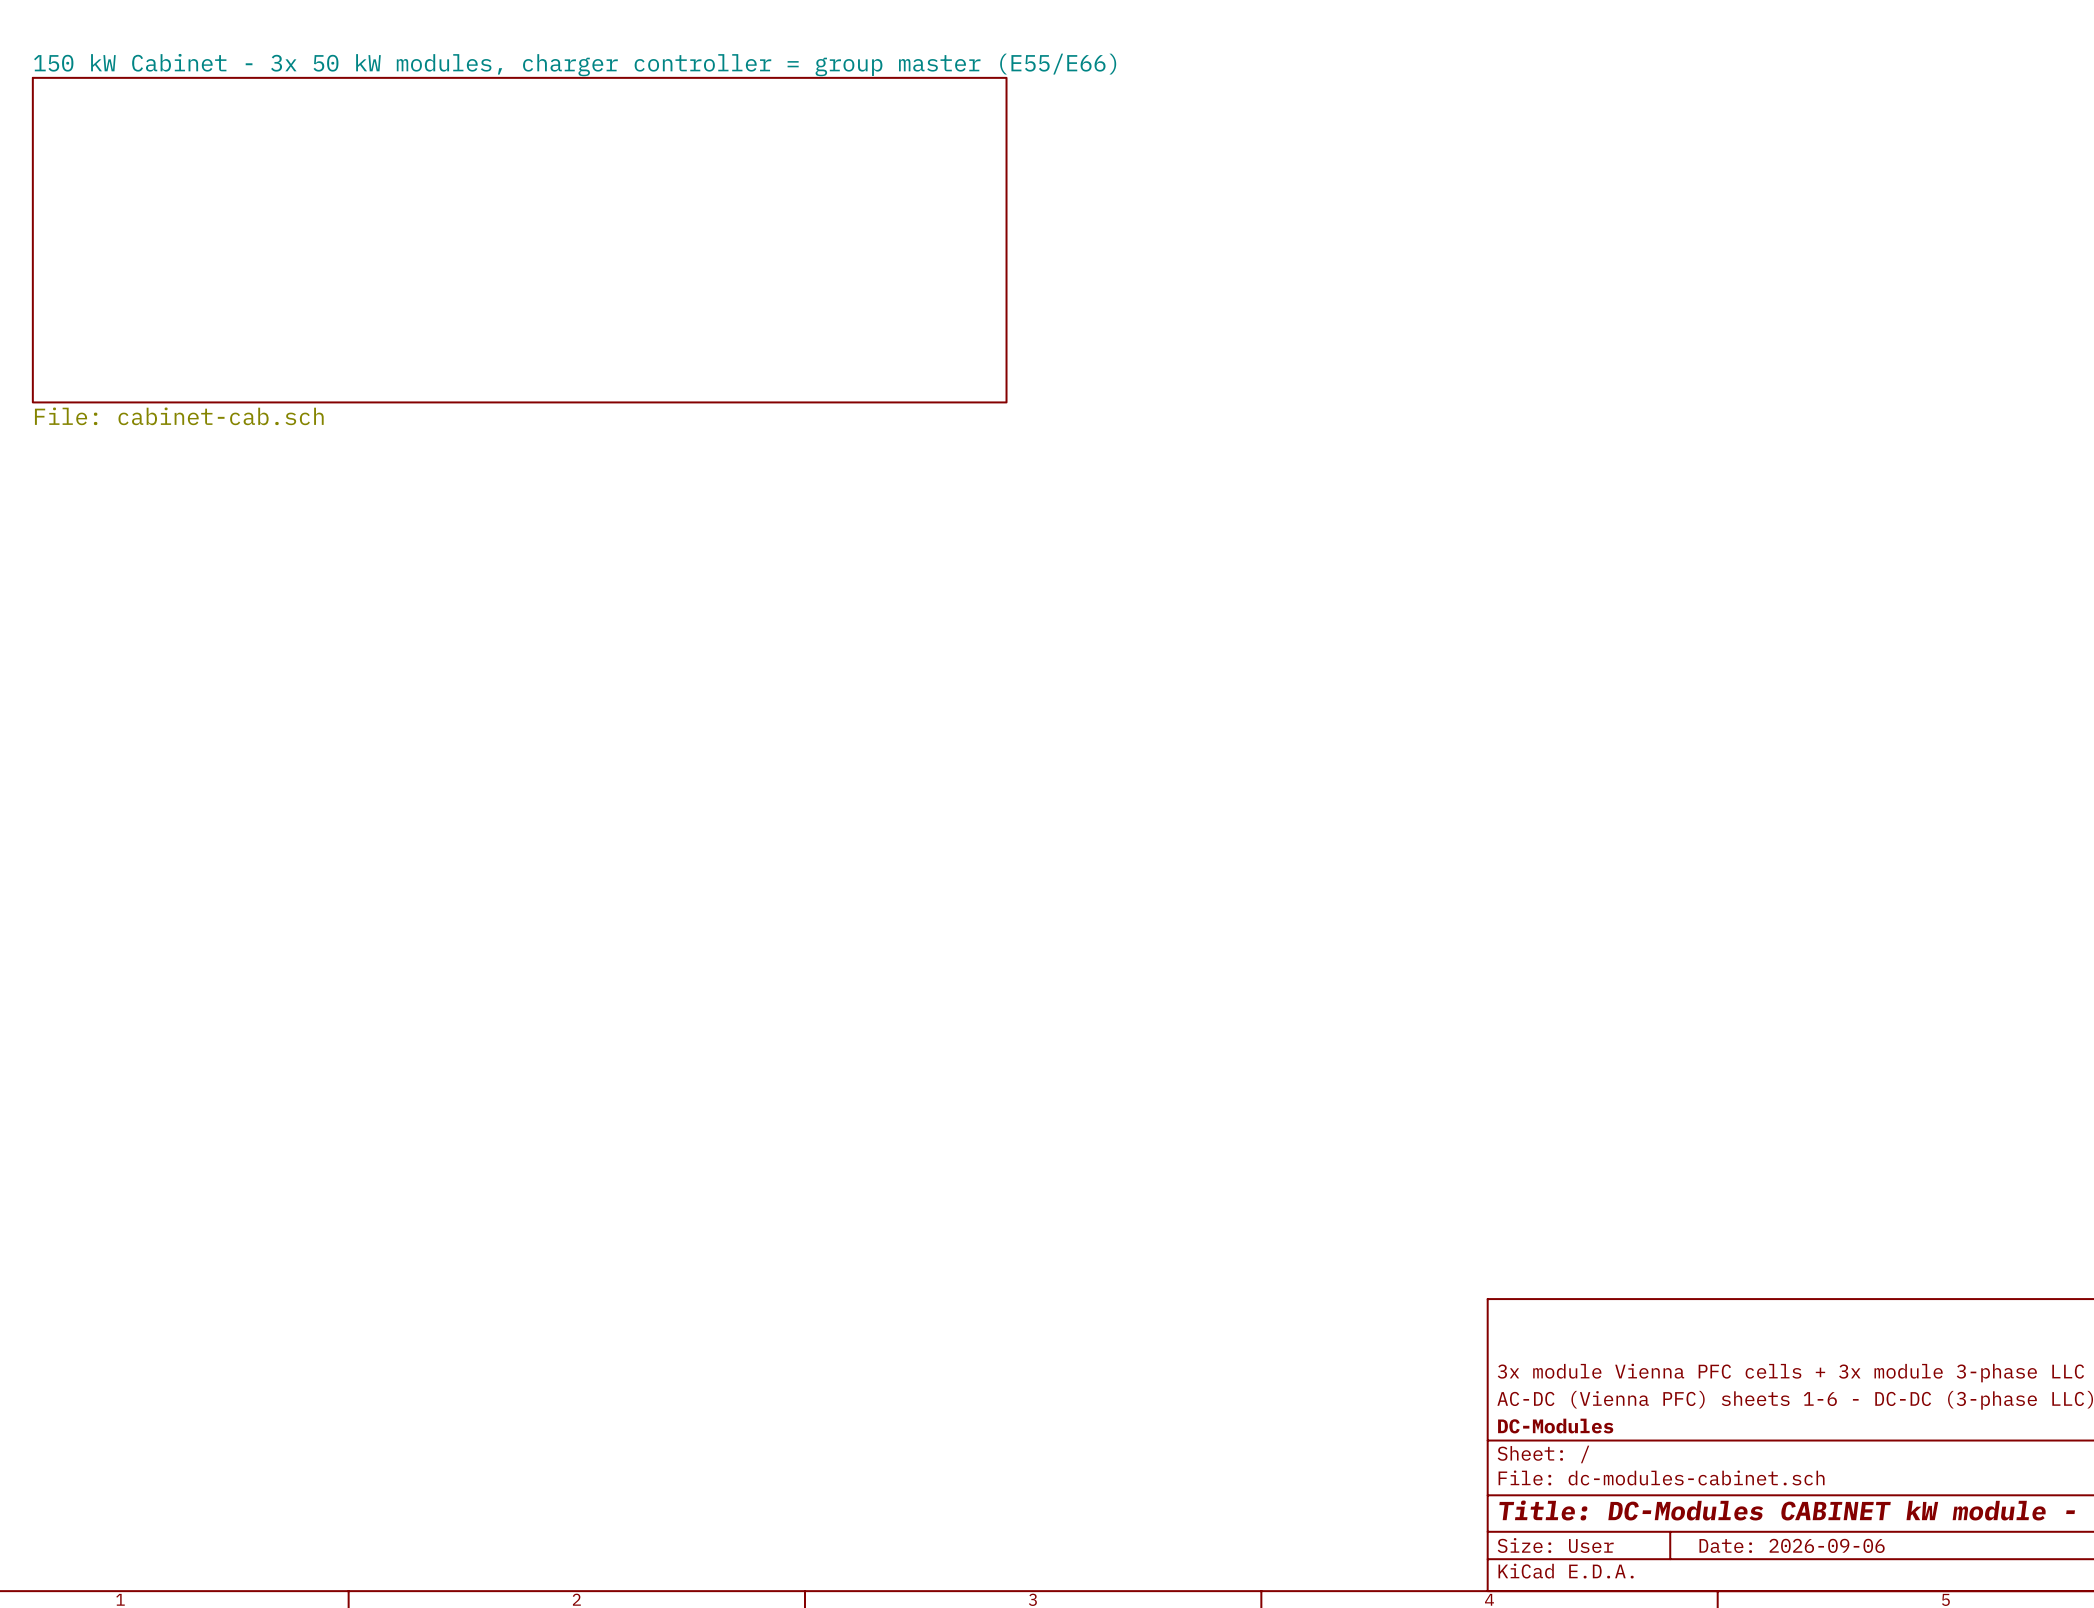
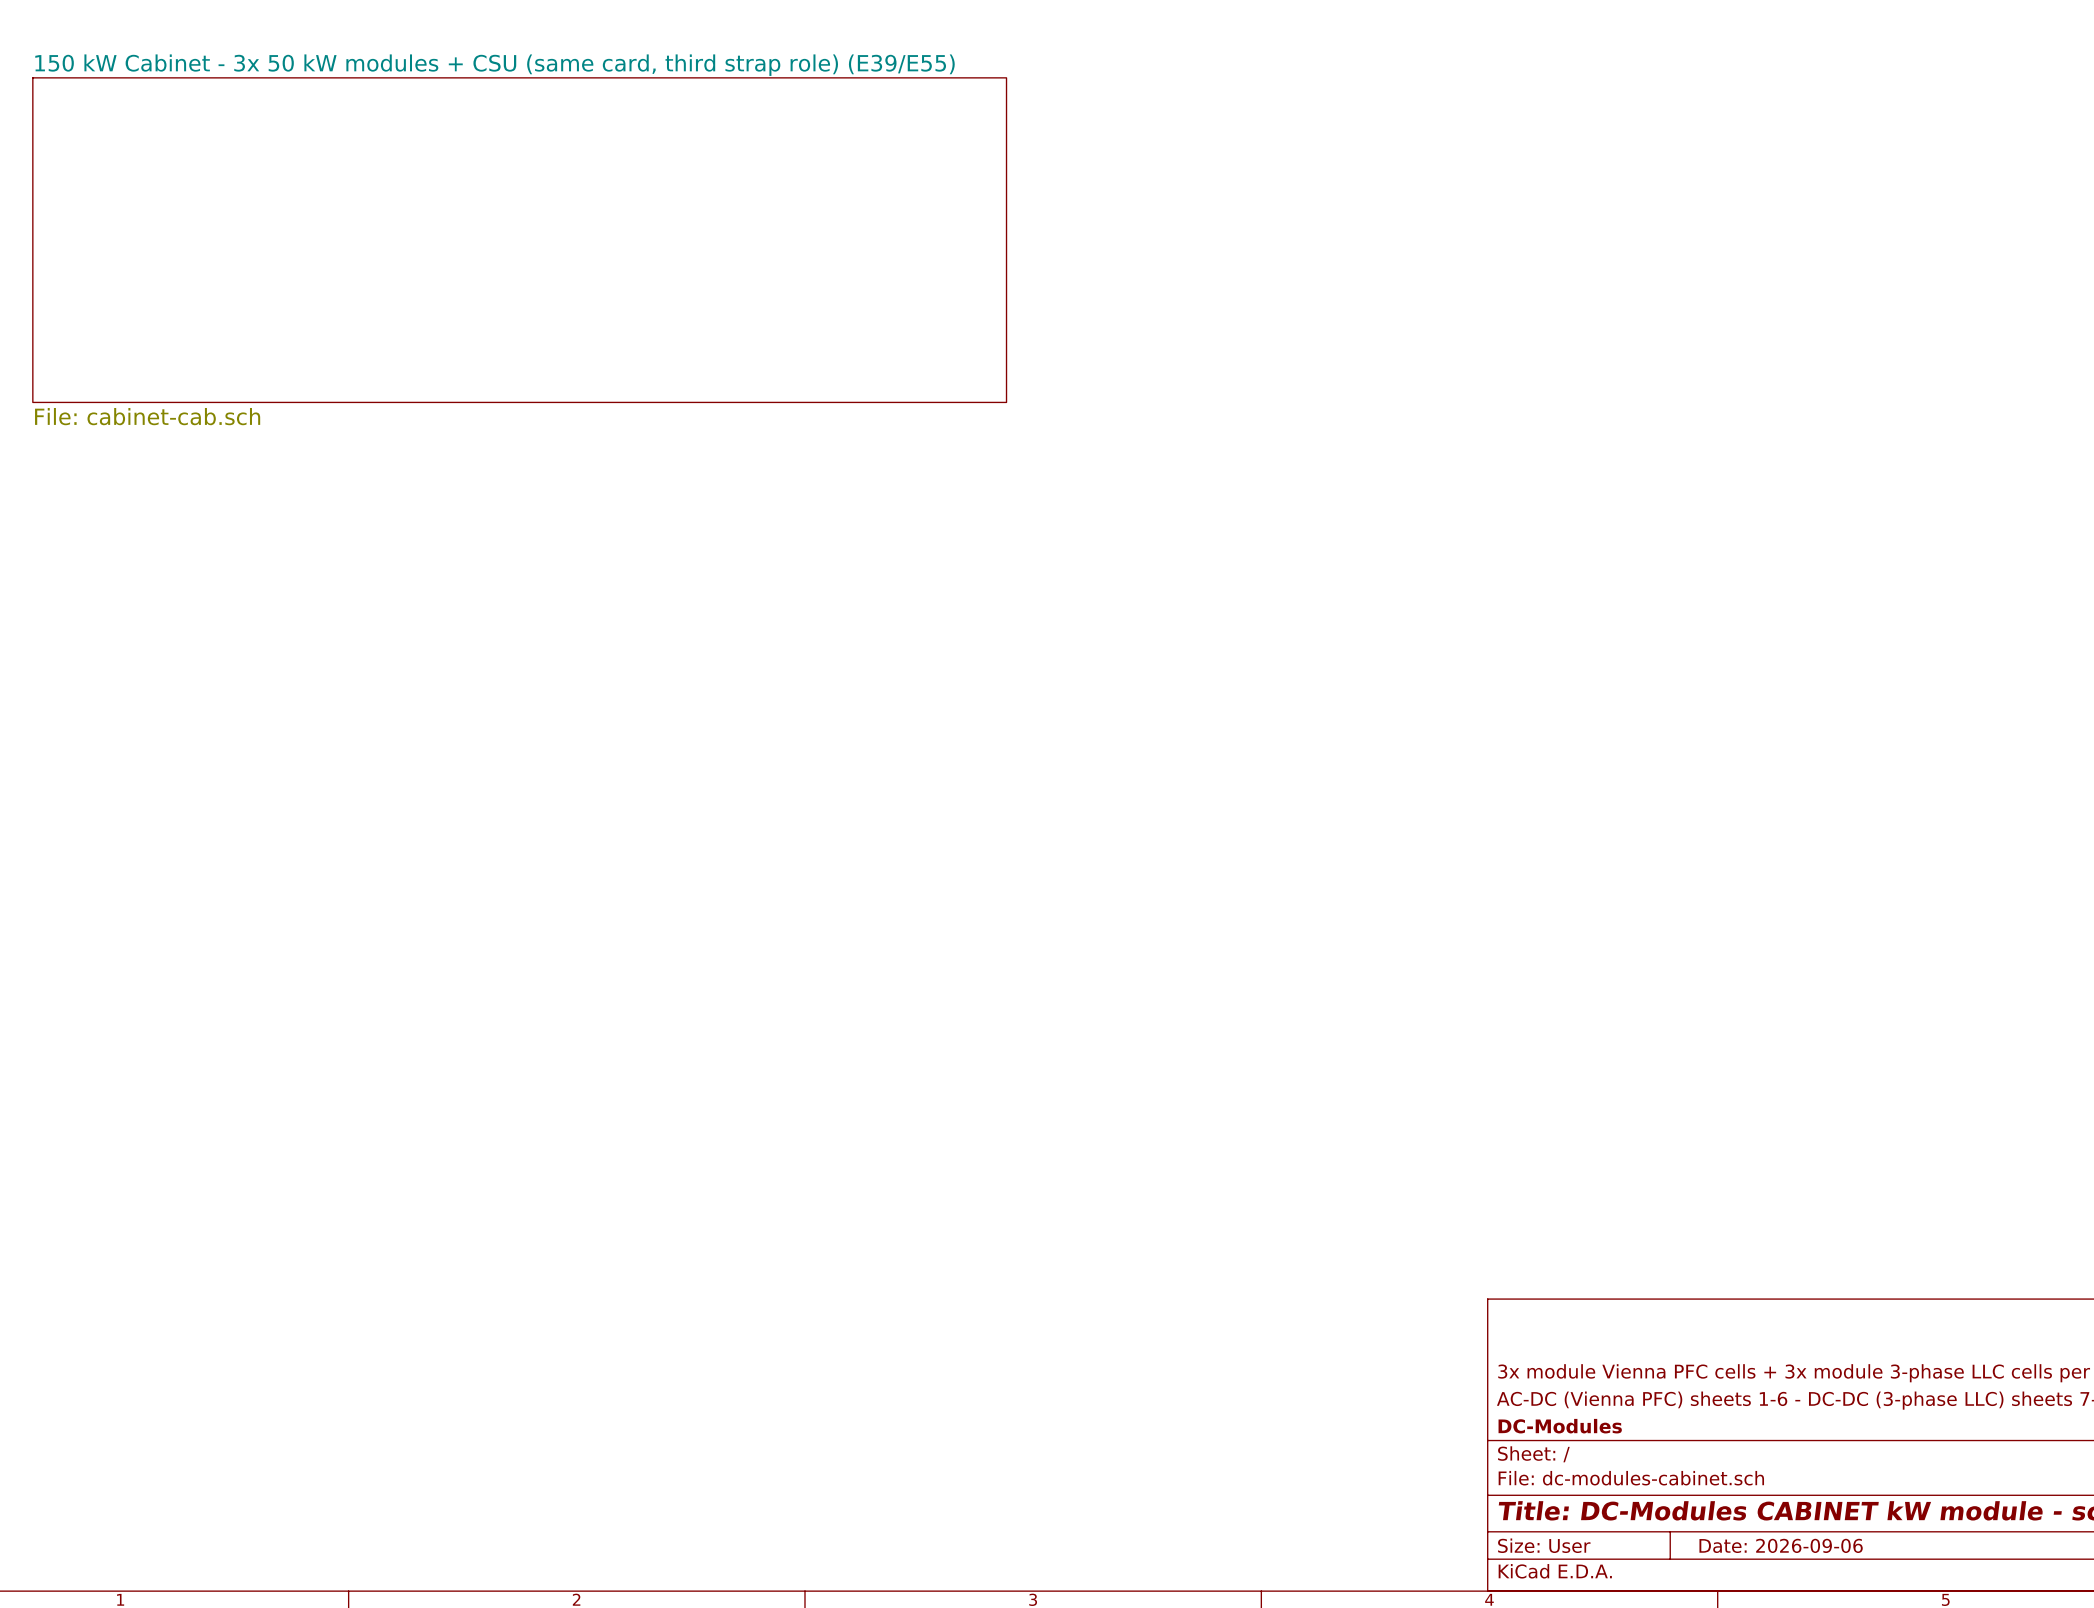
sheet 150 kW Cabinet - 3x 50 kW modules, charger controller = group master (E55/E66) name: 150 kW Cabinet - 3x 50 kW modules, charger controller = group master (E55/E66) (575, 64) -> 150 kW Cabinet - 3x 50 kW modules + CSU (same card, third strap role) (E39/E55) (495, 65)

